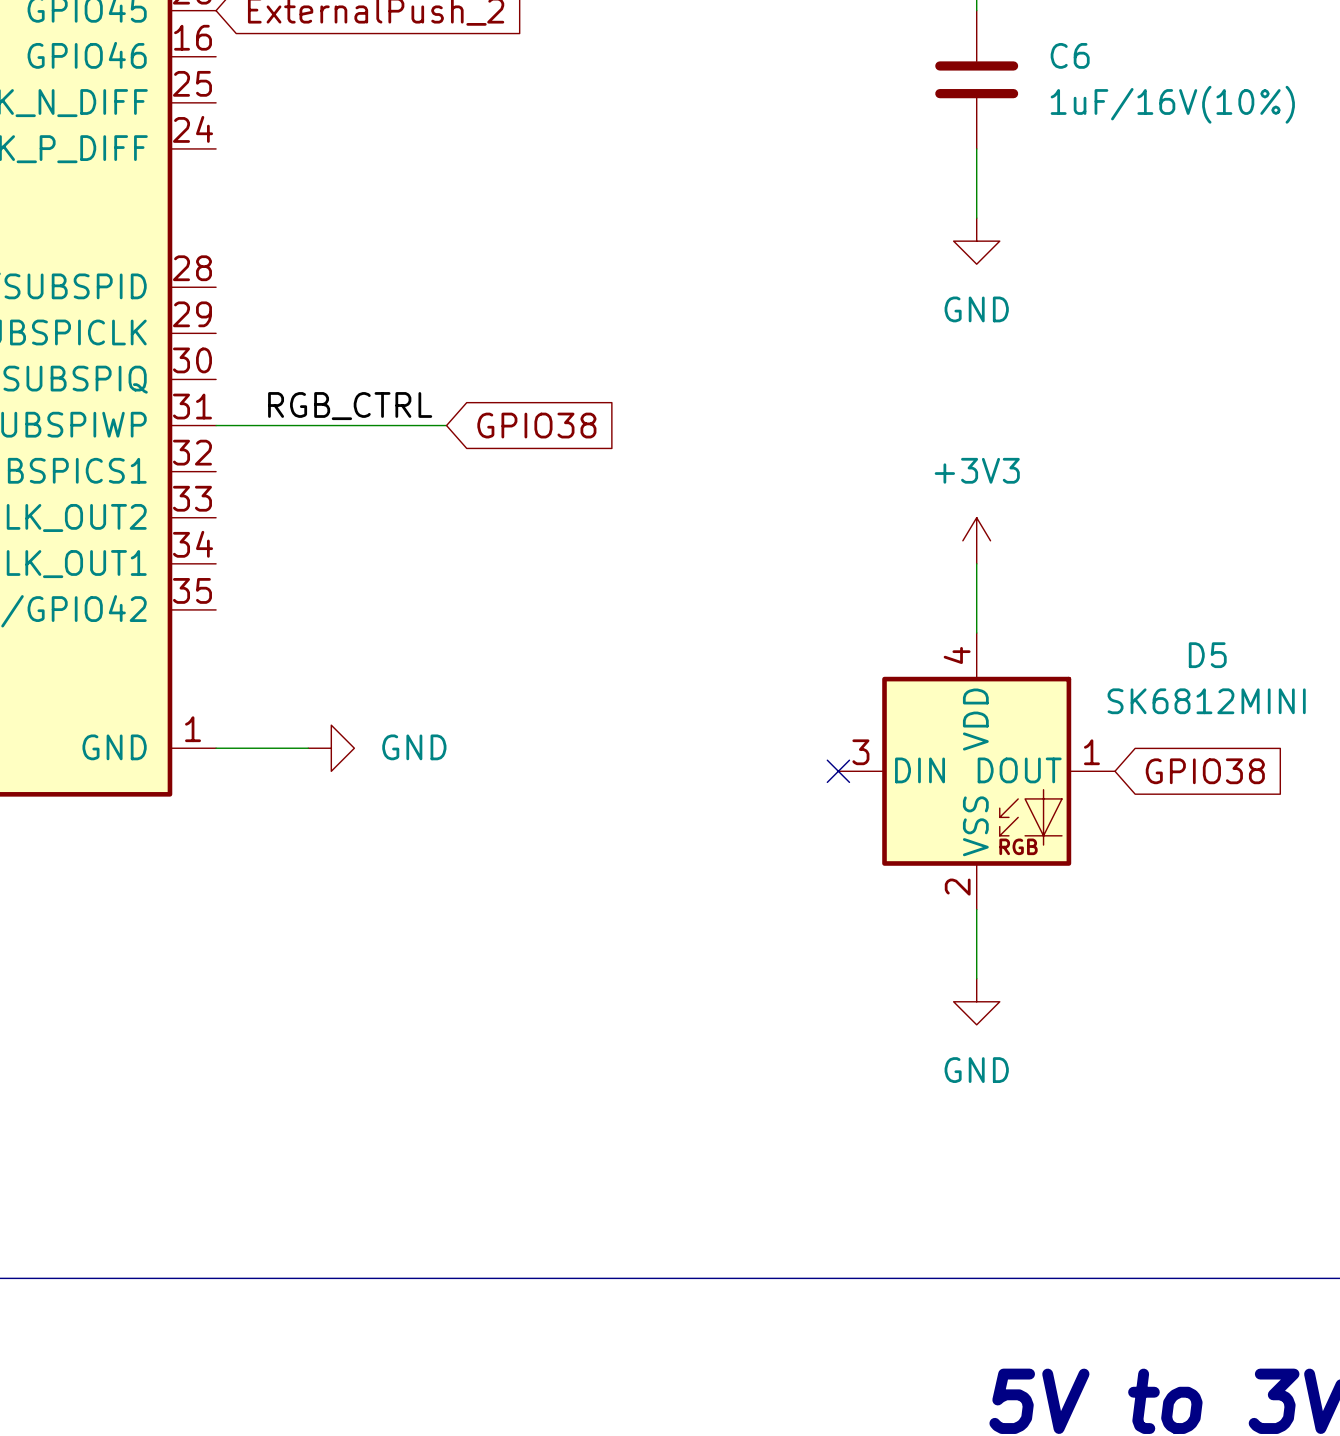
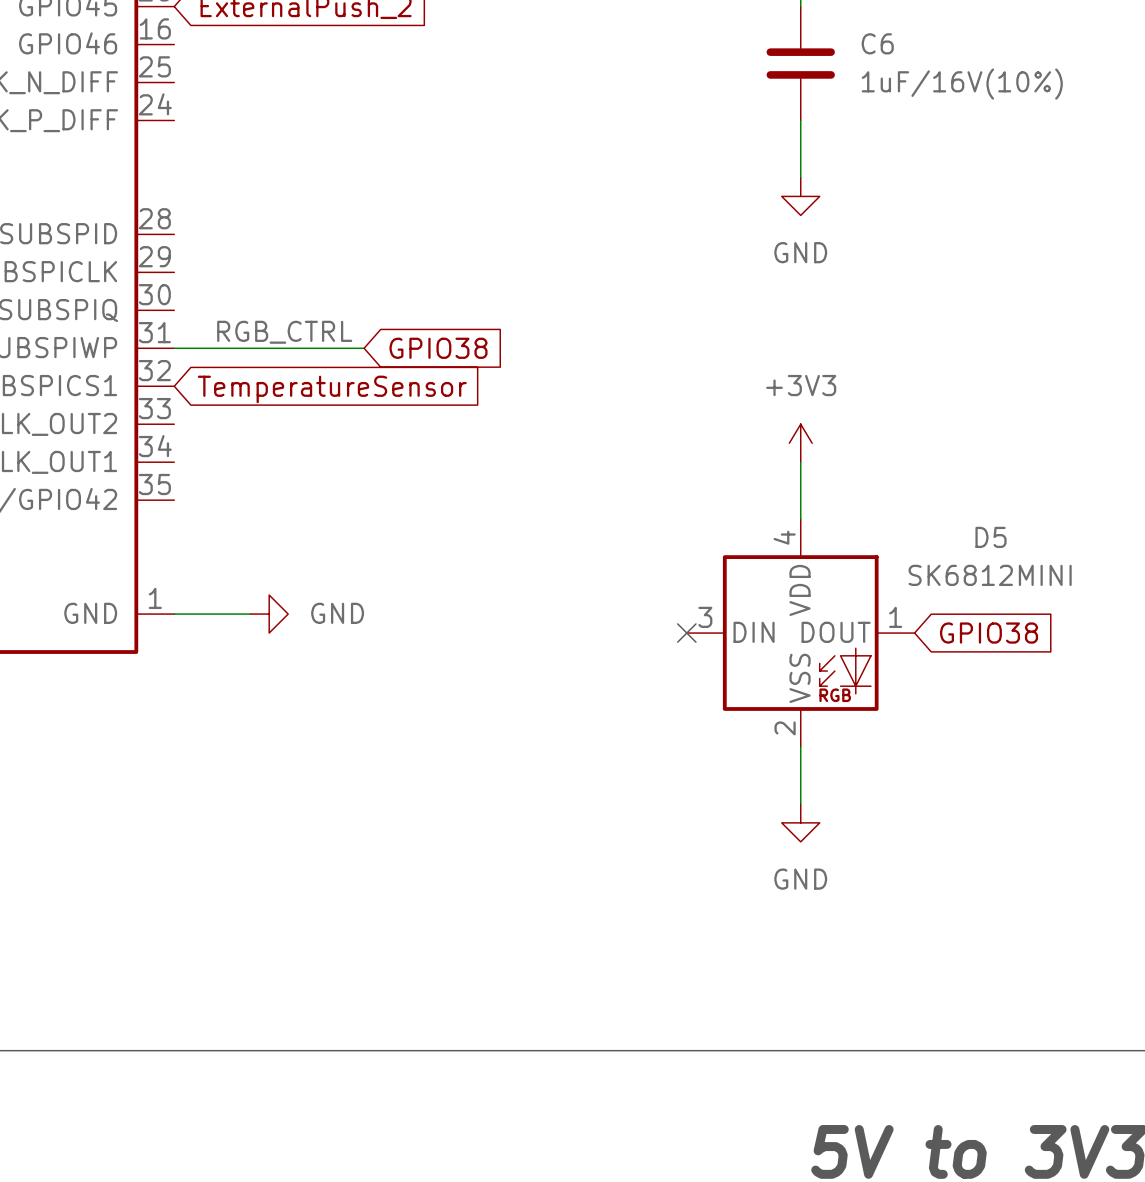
global label: none -> TemperatureSensor (332, 389)

